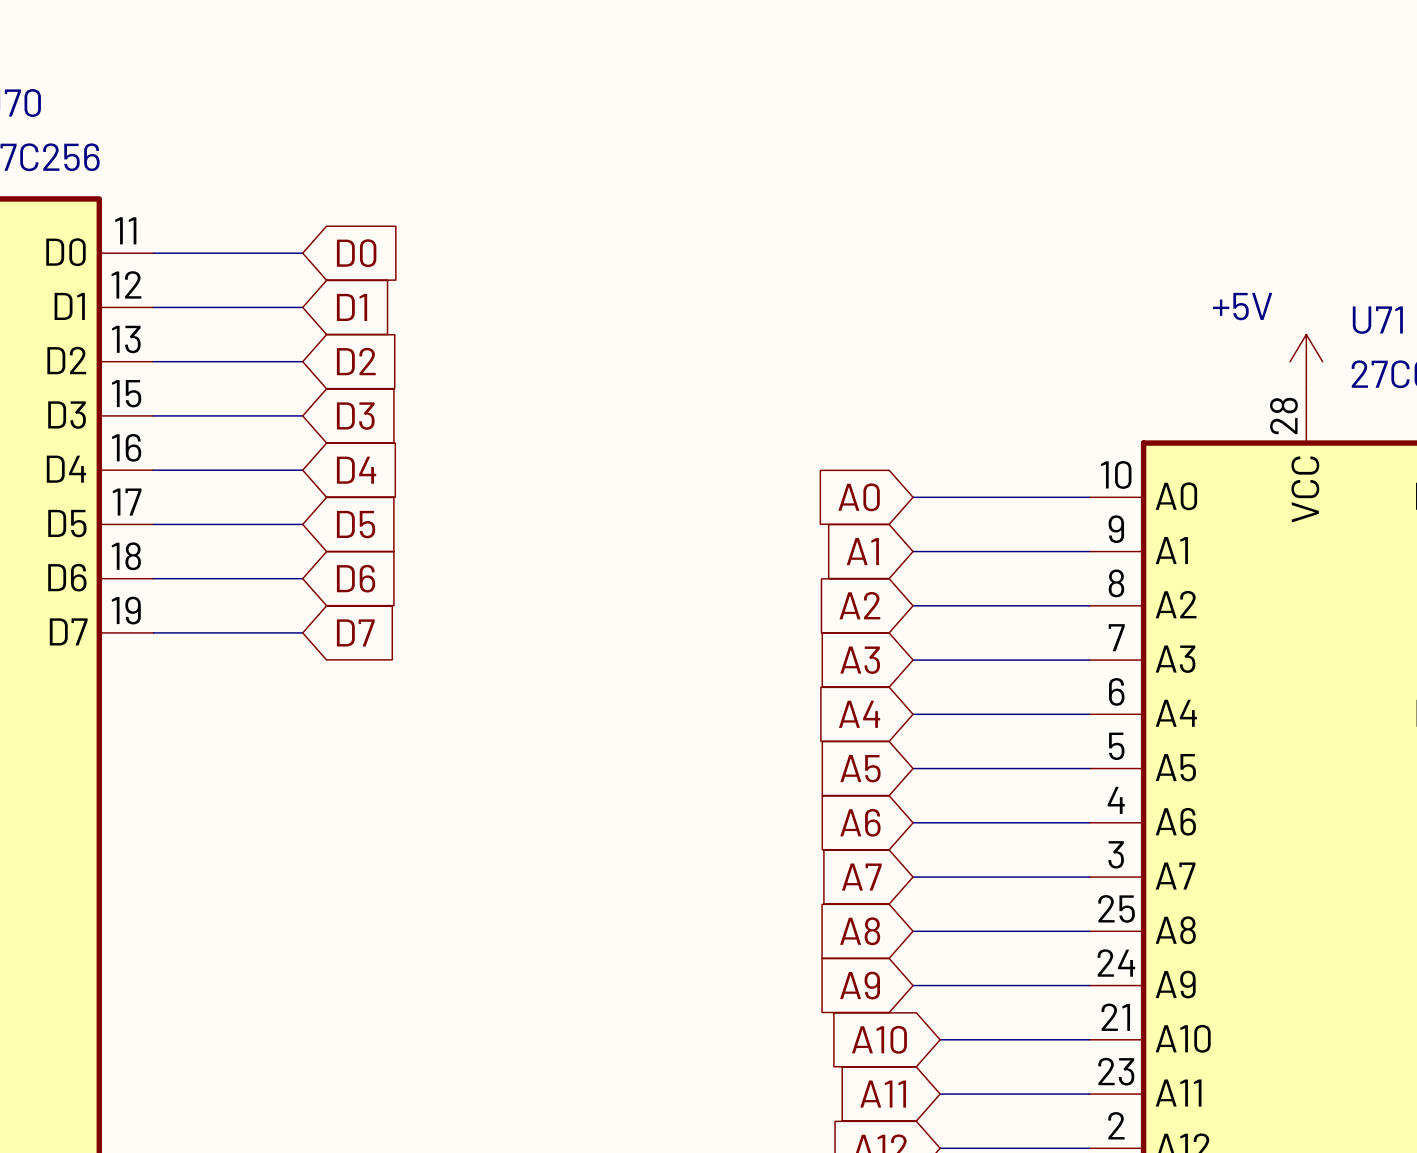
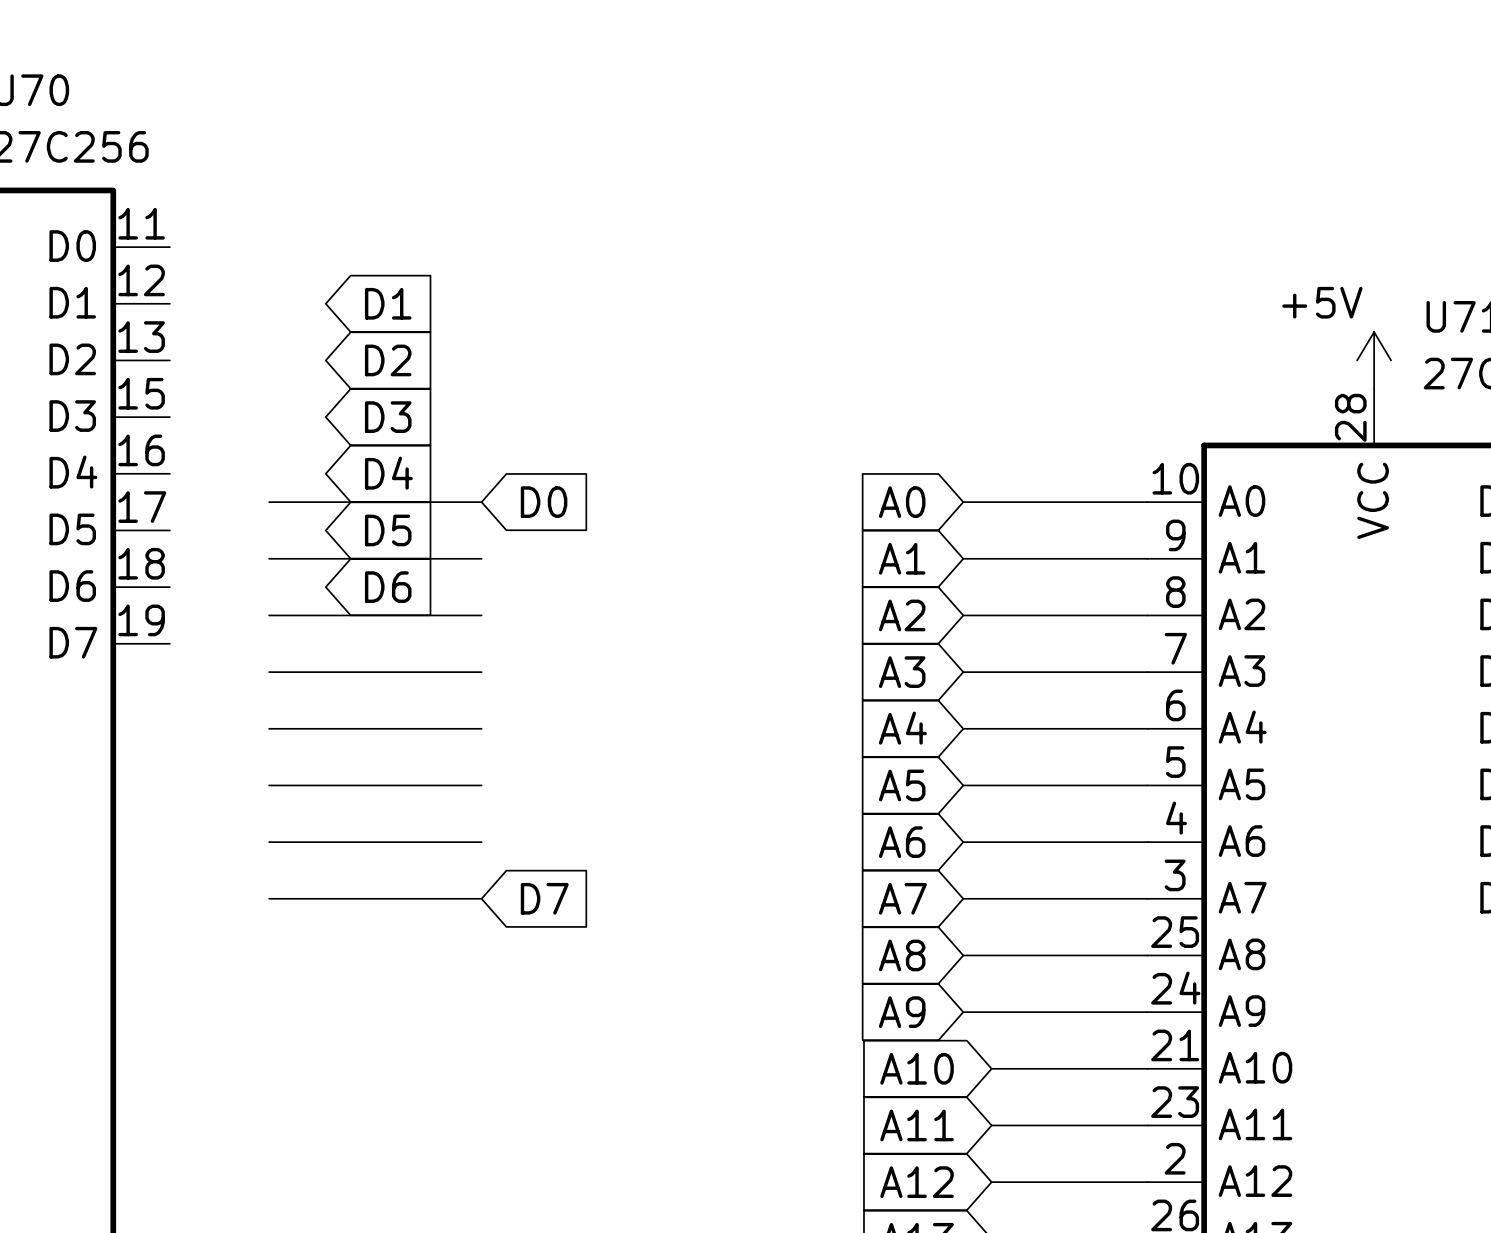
wire: (153, 253) (302, 253) -> none
global label position: D0 (356, 253) -> D0 (544, 502)
wire: (153, 307) (302, 307) -> none
wire: (153, 361) (302, 361) -> none
wire: (153, 415) (302, 415) -> none
wire: (153, 470) (302, 470) -> none
wire: none -> (269, 502) (481, 502)
wire: (153, 524) (302, 524) -> none
wire: none -> (269, 558) (481, 558)
wire: (153, 578) (302, 578) -> none
wire: none -> (269, 615) (481, 615)
wire: (153, 632) (302, 632) -> none
global label position: D7 (355, 632) -> D7 (544, 898)
wire: none -> (269, 672) (481, 672)
wire: none -> (269, 728) (481, 728)
wire: none -> (269, 785) (481, 785)
wire: none -> (269, 842) (481, 842)
wire: none -> (269, 898) (481, 898)

